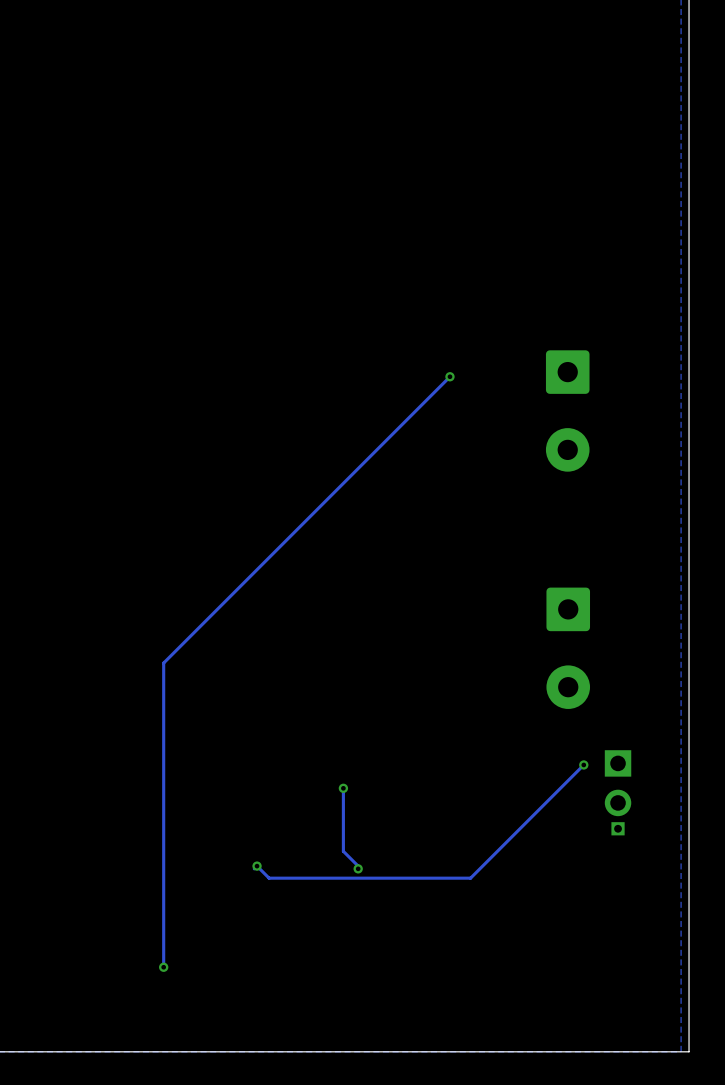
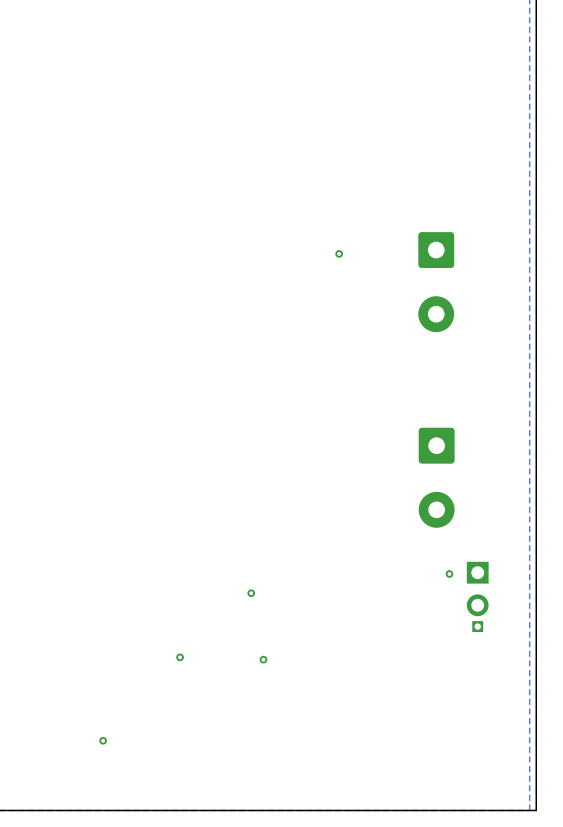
track: (449, 376) (163, 663) (163, 967) -> none
track: (583, 764) (470, 878) (269, 878) (257, 866) (254, 868) -> none
track: (343, 788) (343, 851) (358, 866) (358, 868) -> none

